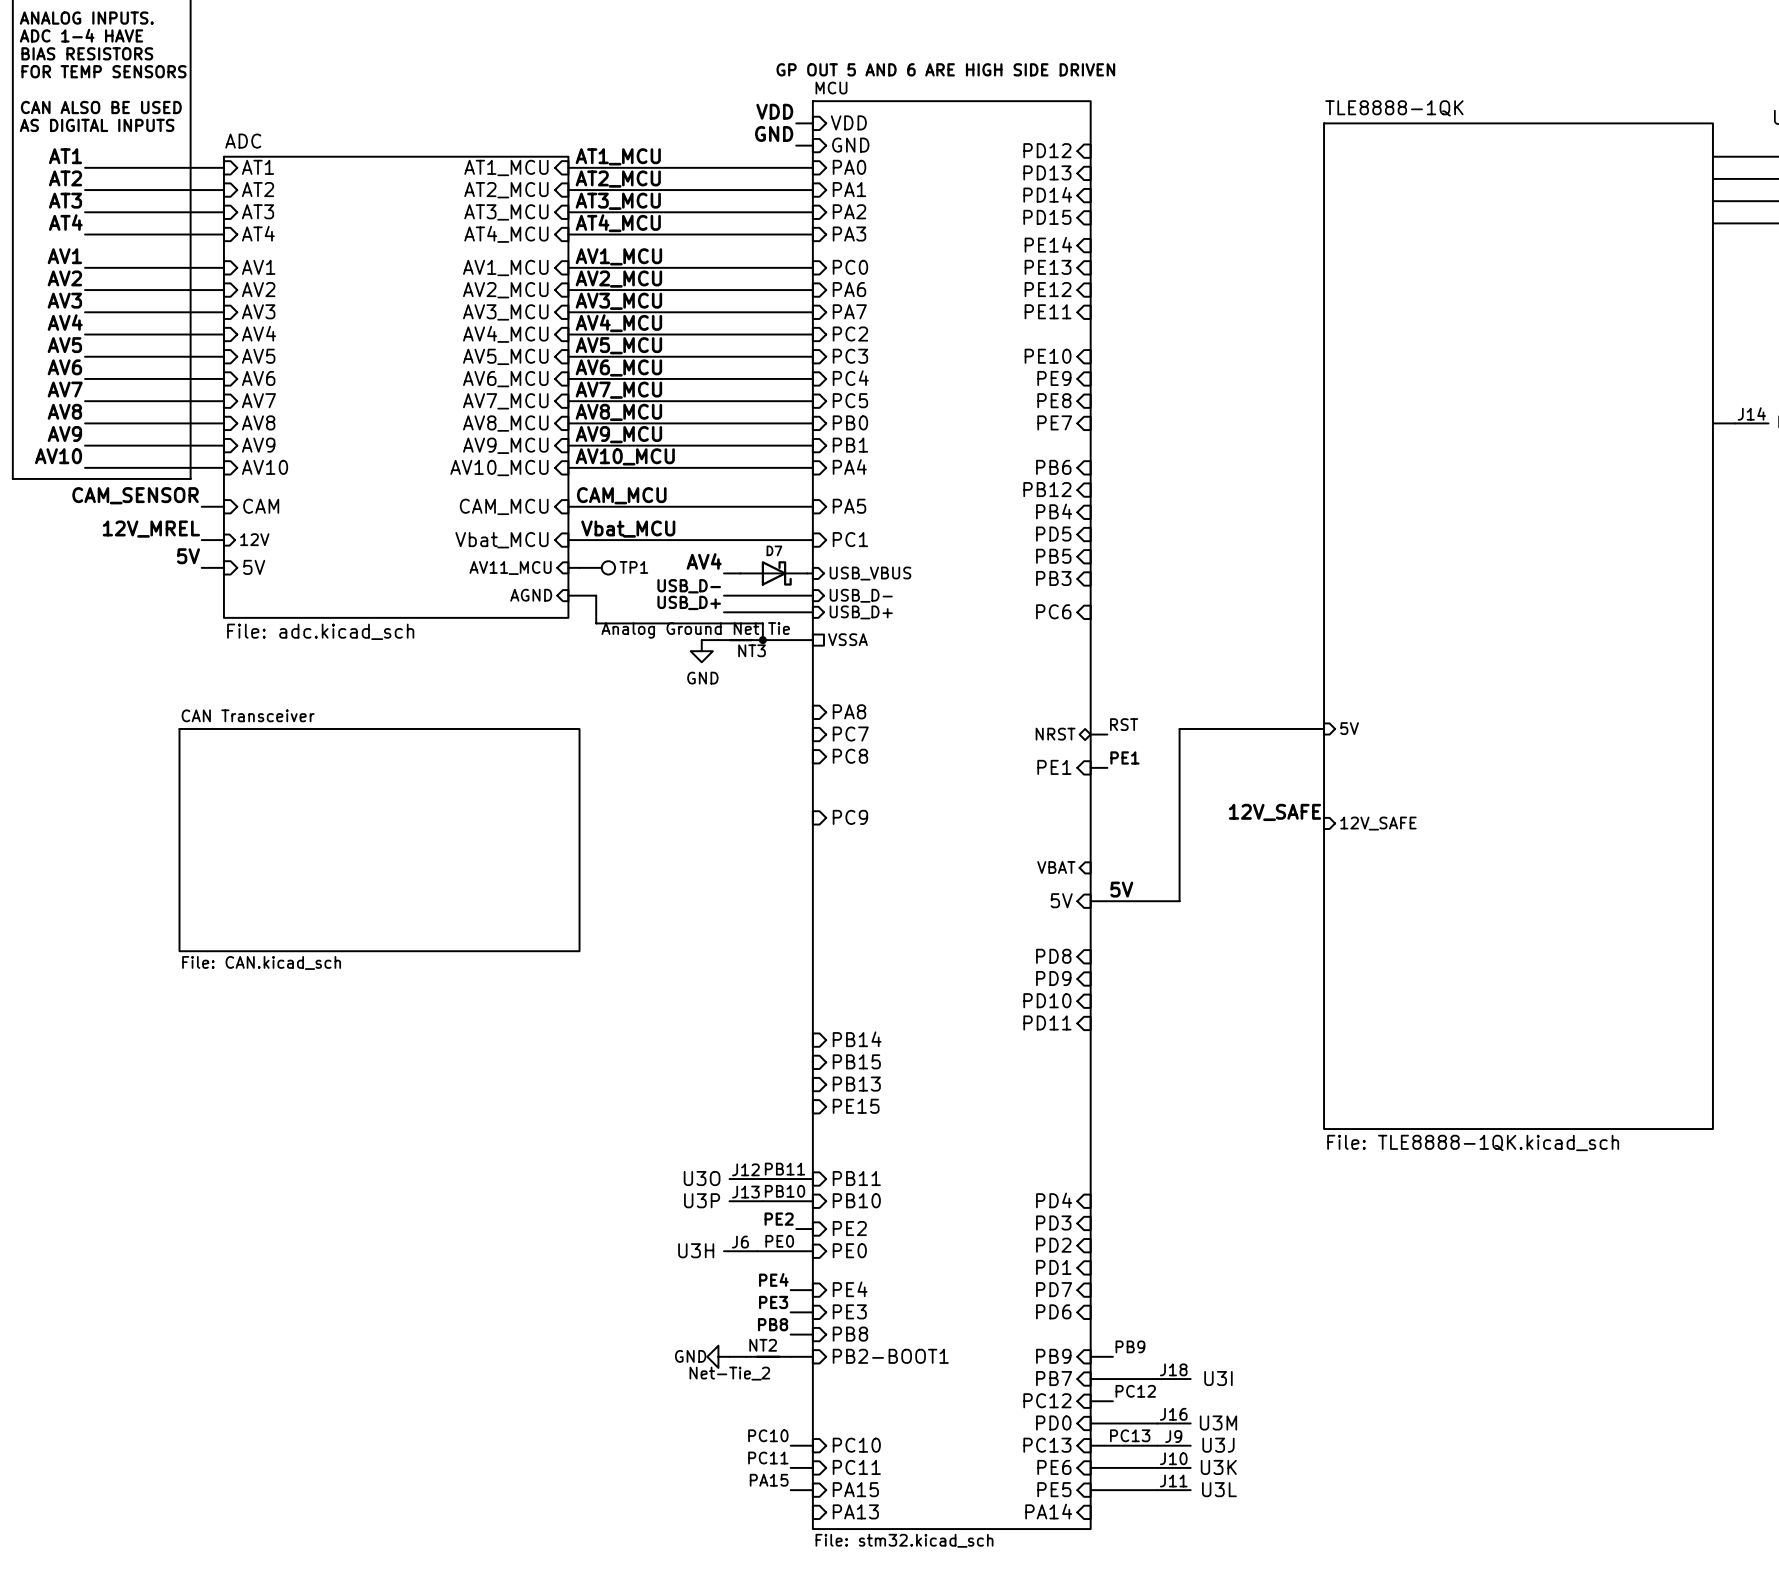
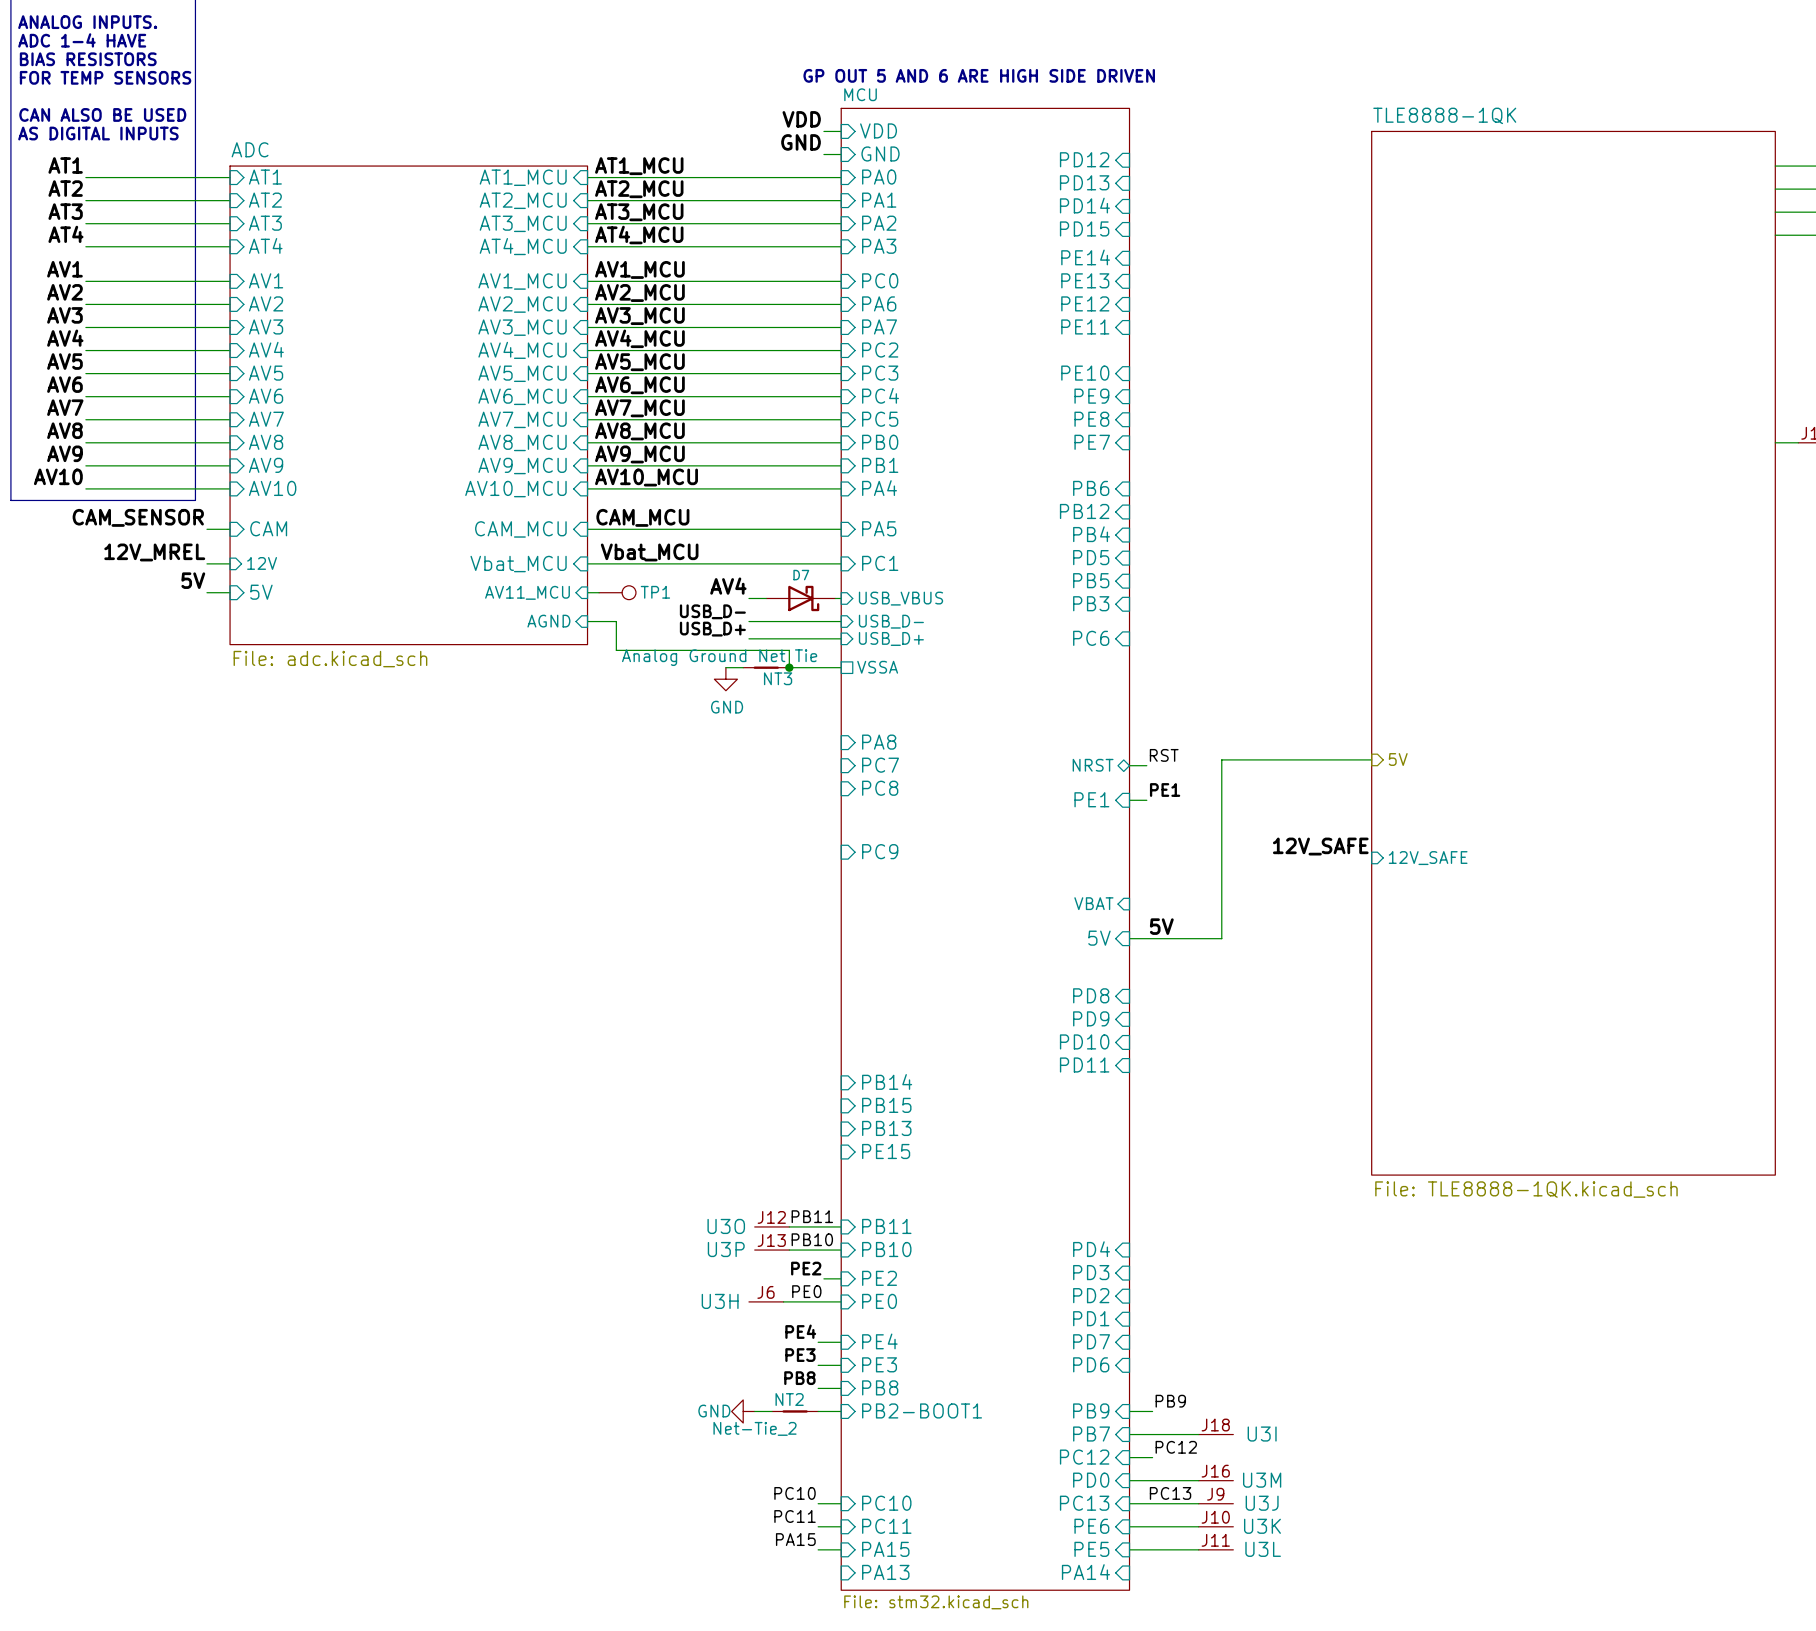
sheet CAN Transceiver: File: CAN.kicad_sch (379, 840) -> none

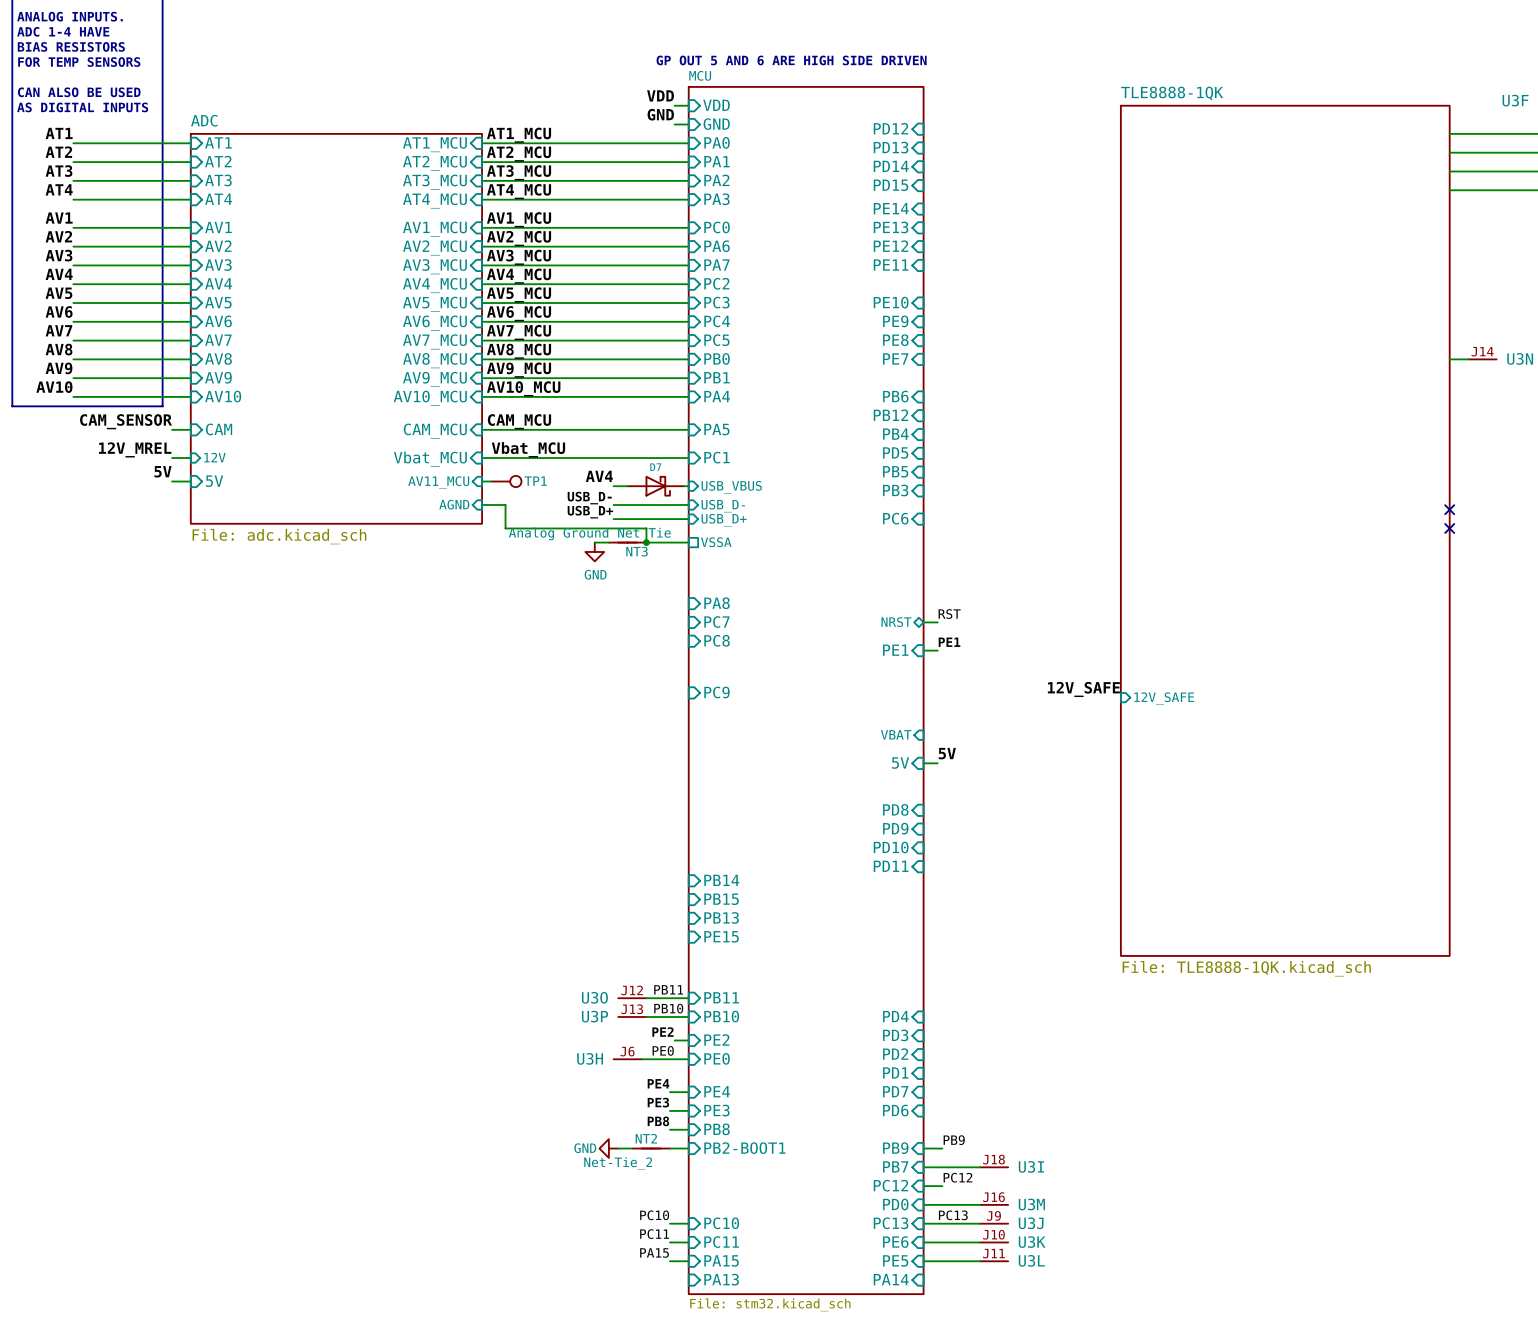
no-connect mark: none -> (1449, 509)
no-connect mark: none -> (1449, 528)
wire: (1371, 759) (1221, 759) (1221, 938) (1146, 938) -> none
hierarchical label: 5V (1398, 759) -> none

